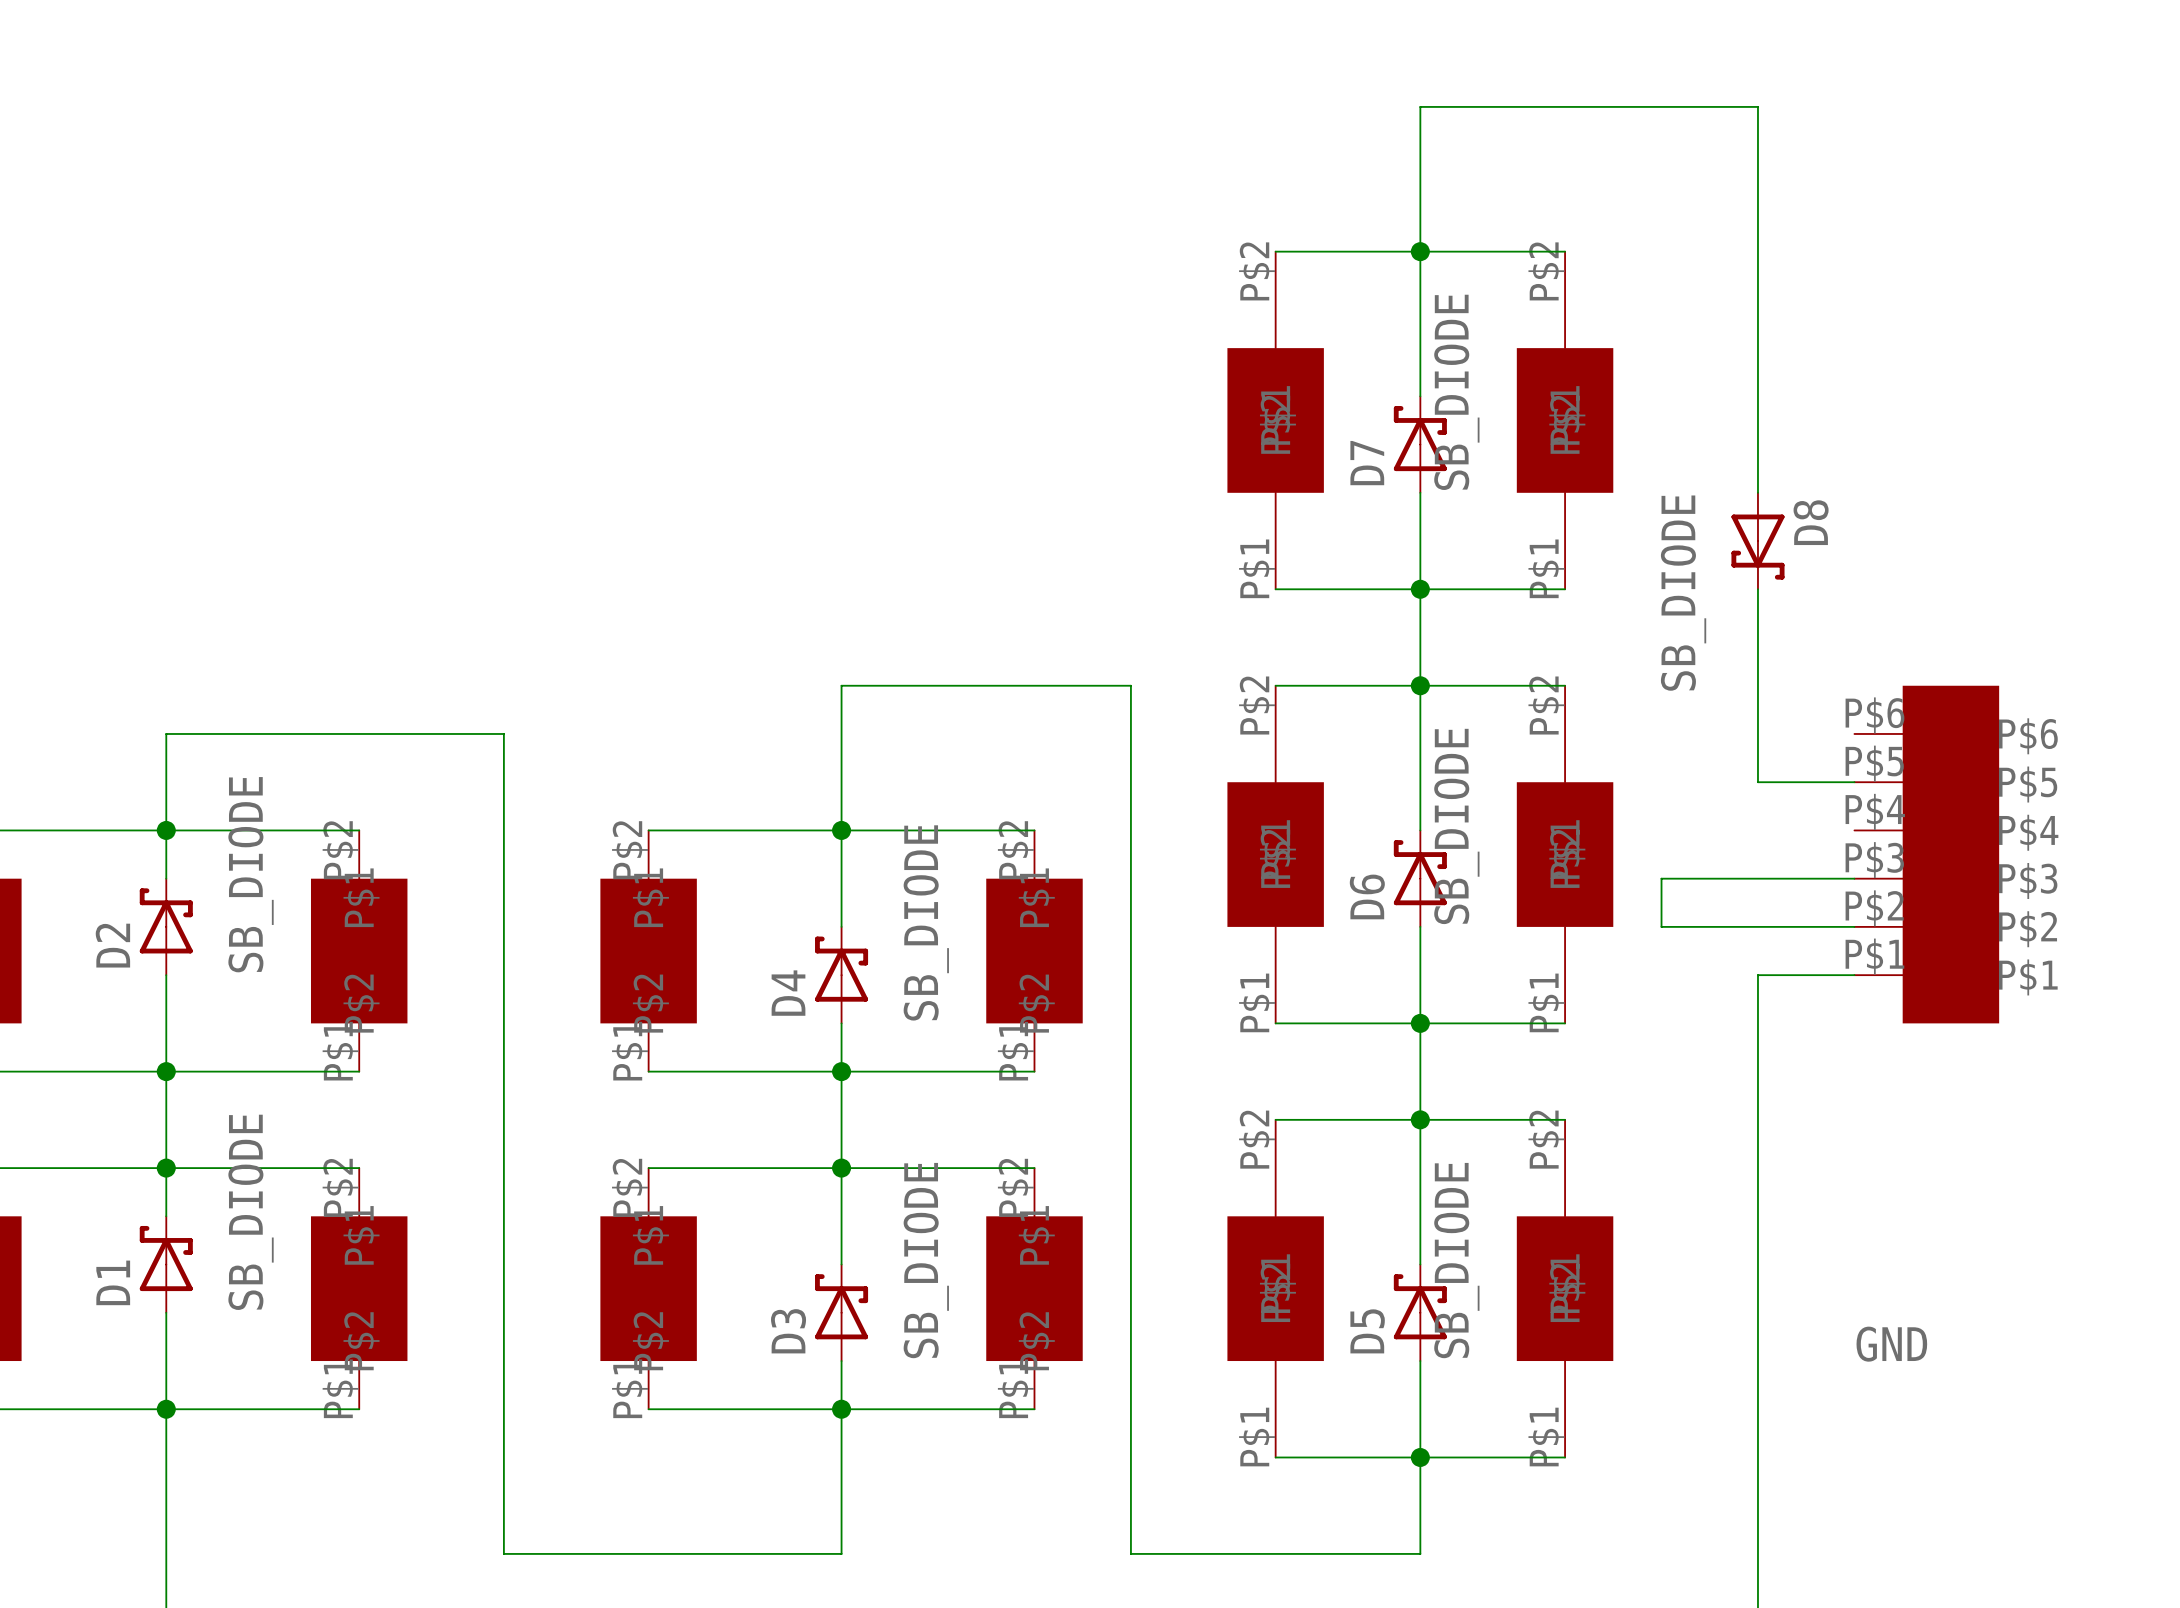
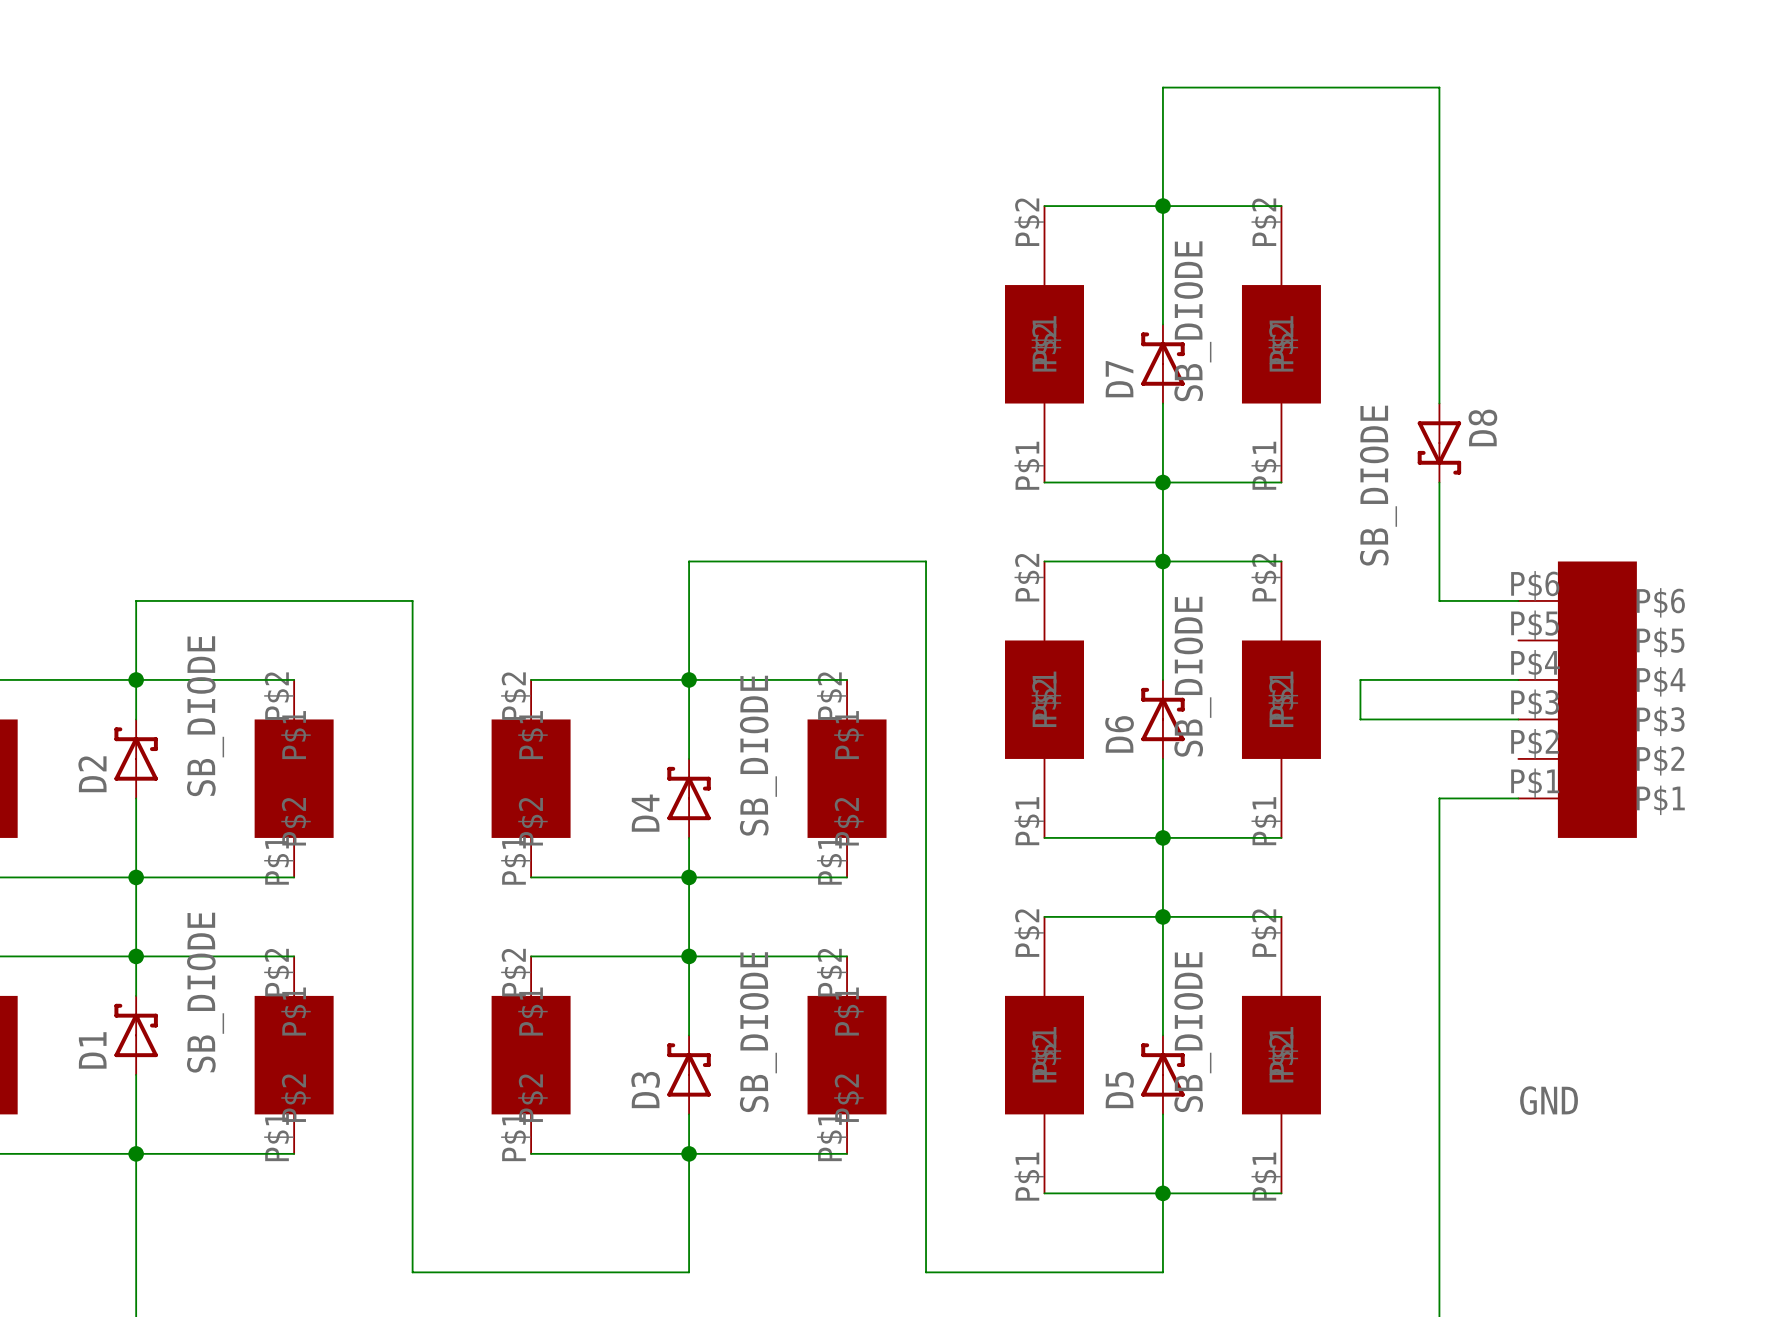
wire: (1757, 733) (1757, 782) (1854, 782) -> (1439, 600) (1518, 600)
wire: (1661, 878) (1661, 926) (1854, 926) -> (1360, 719) (1360, 679) (1518, 679)

